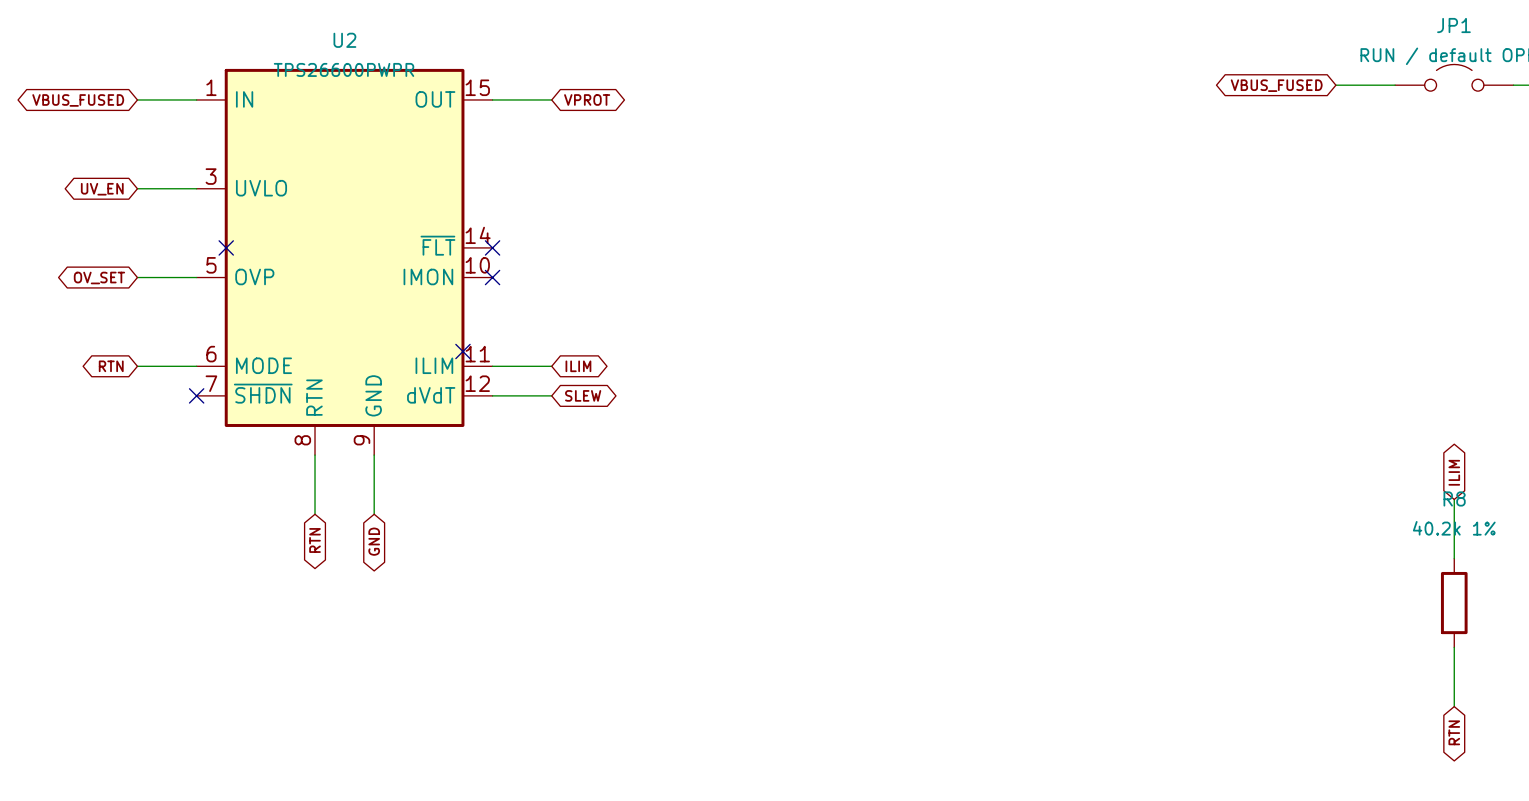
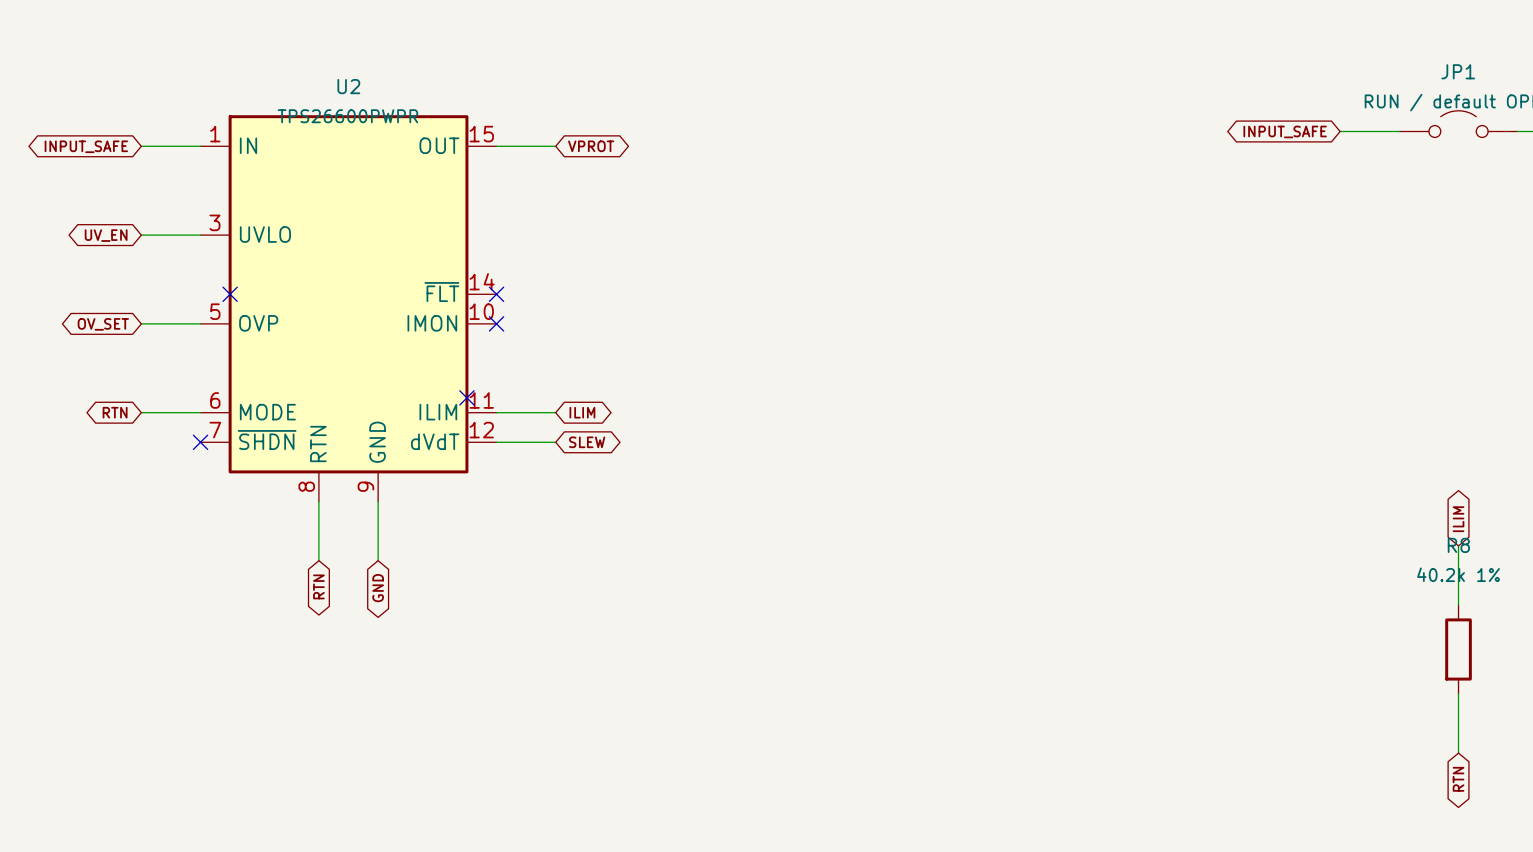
global label: VBUS_FUSED (1276, 85) -> INPUT_SAFE (1285, 131)
global label: VBUS_FUSED (78, 100) -> INPUT_SAFE (86, 146)

